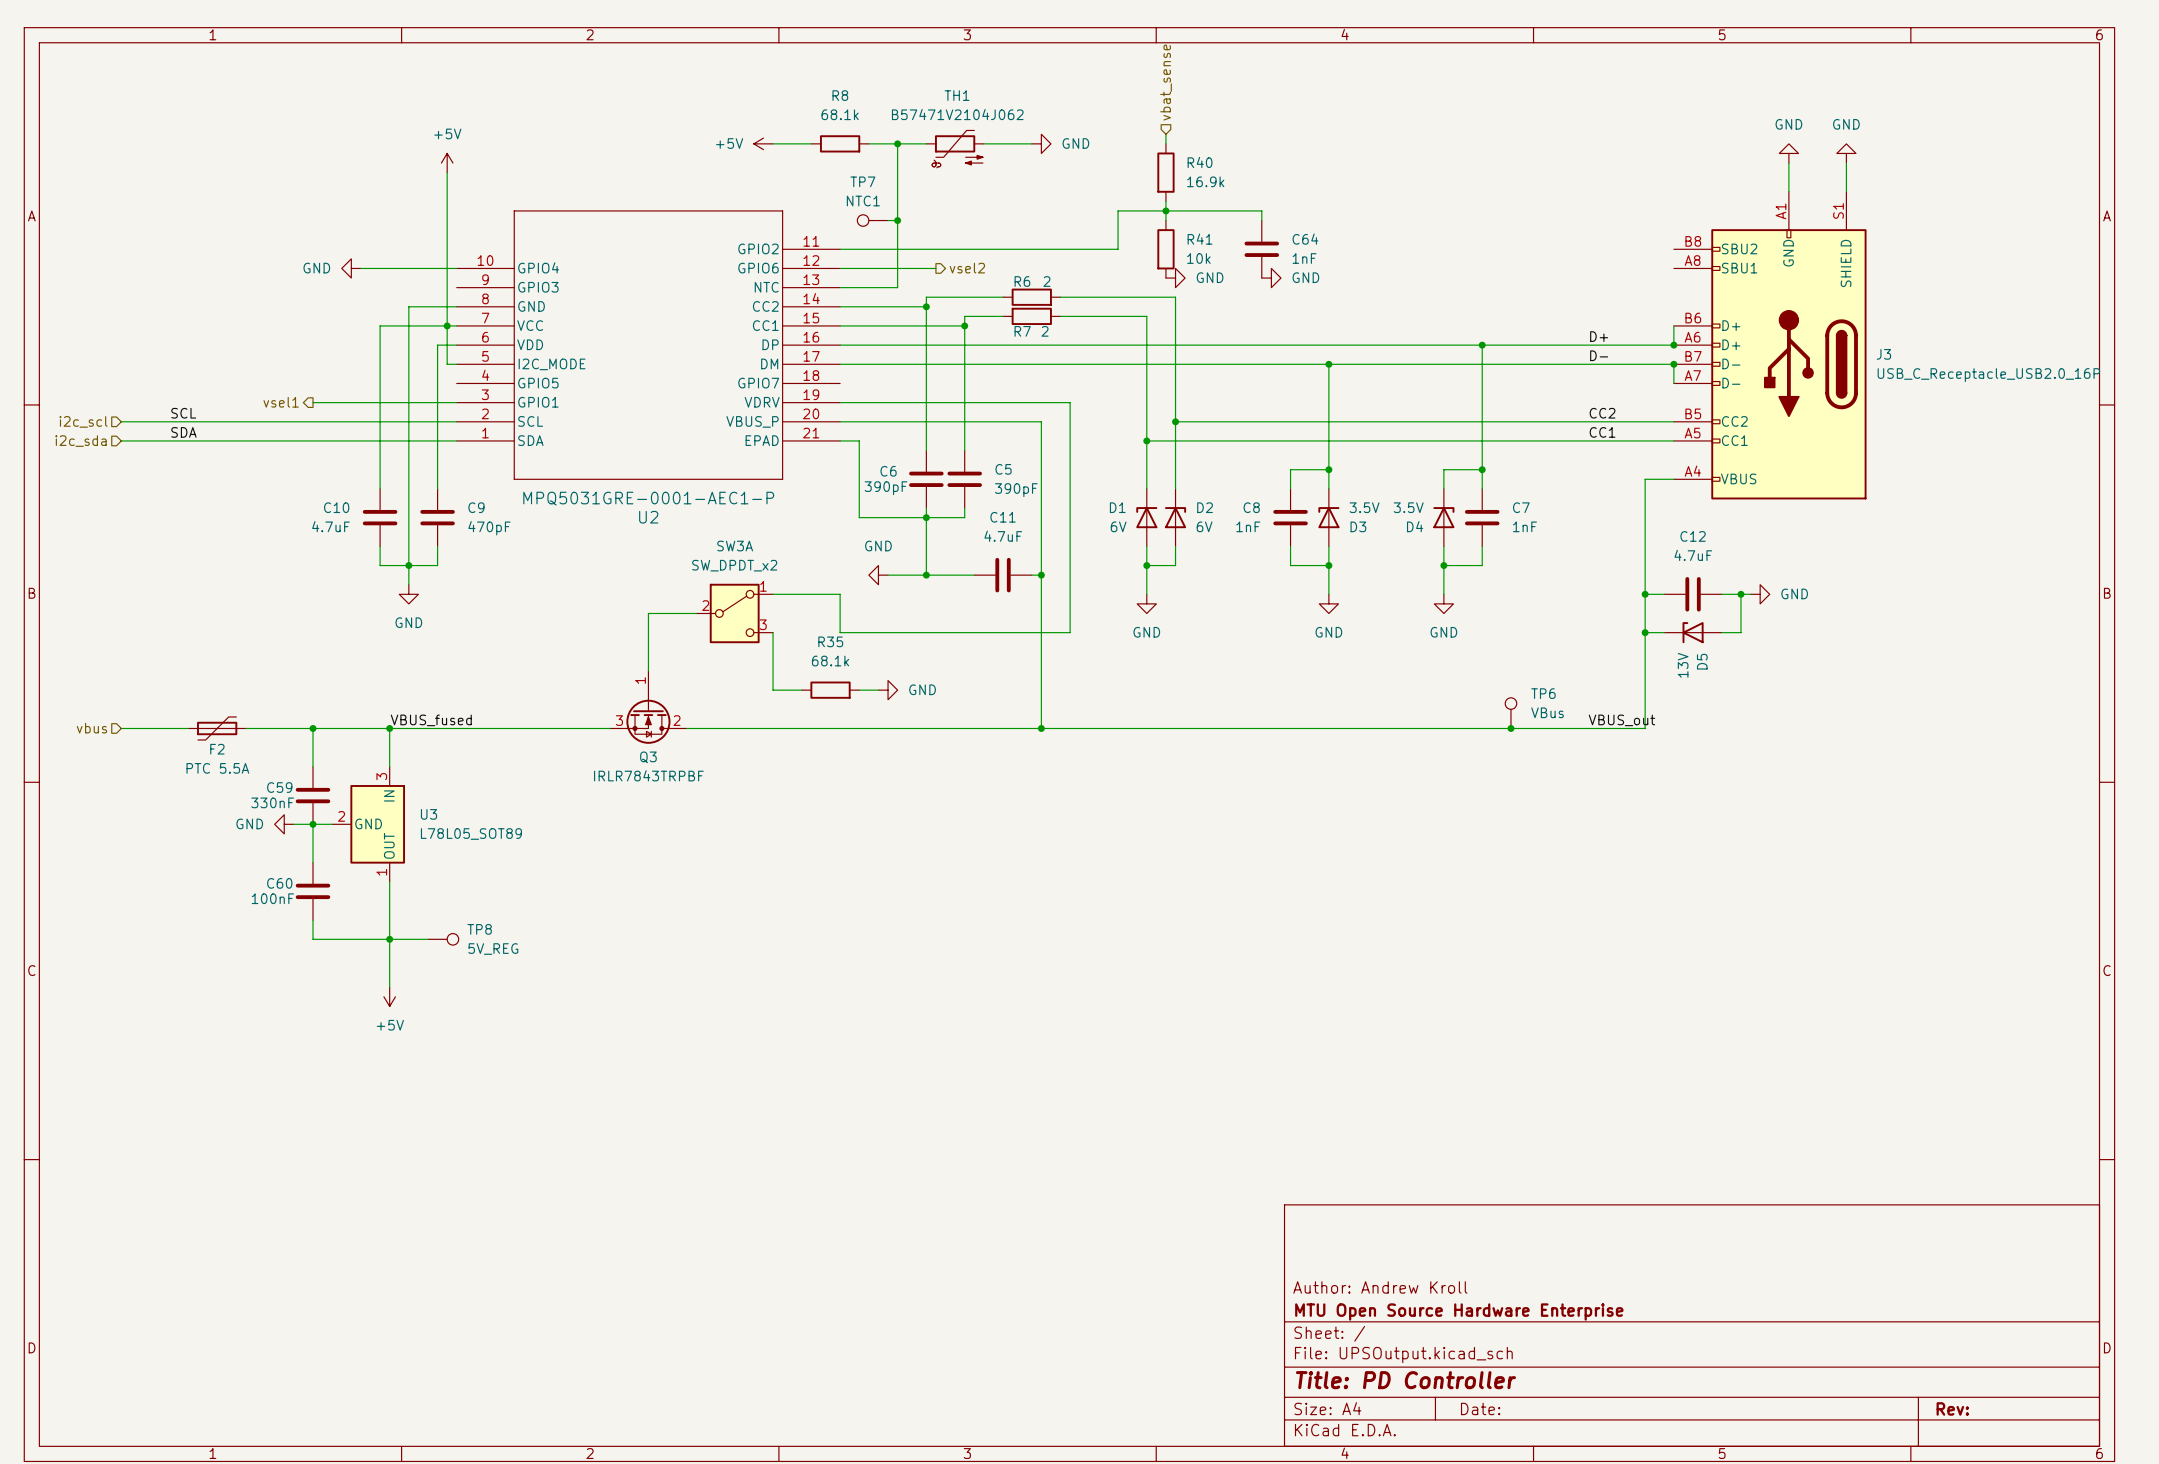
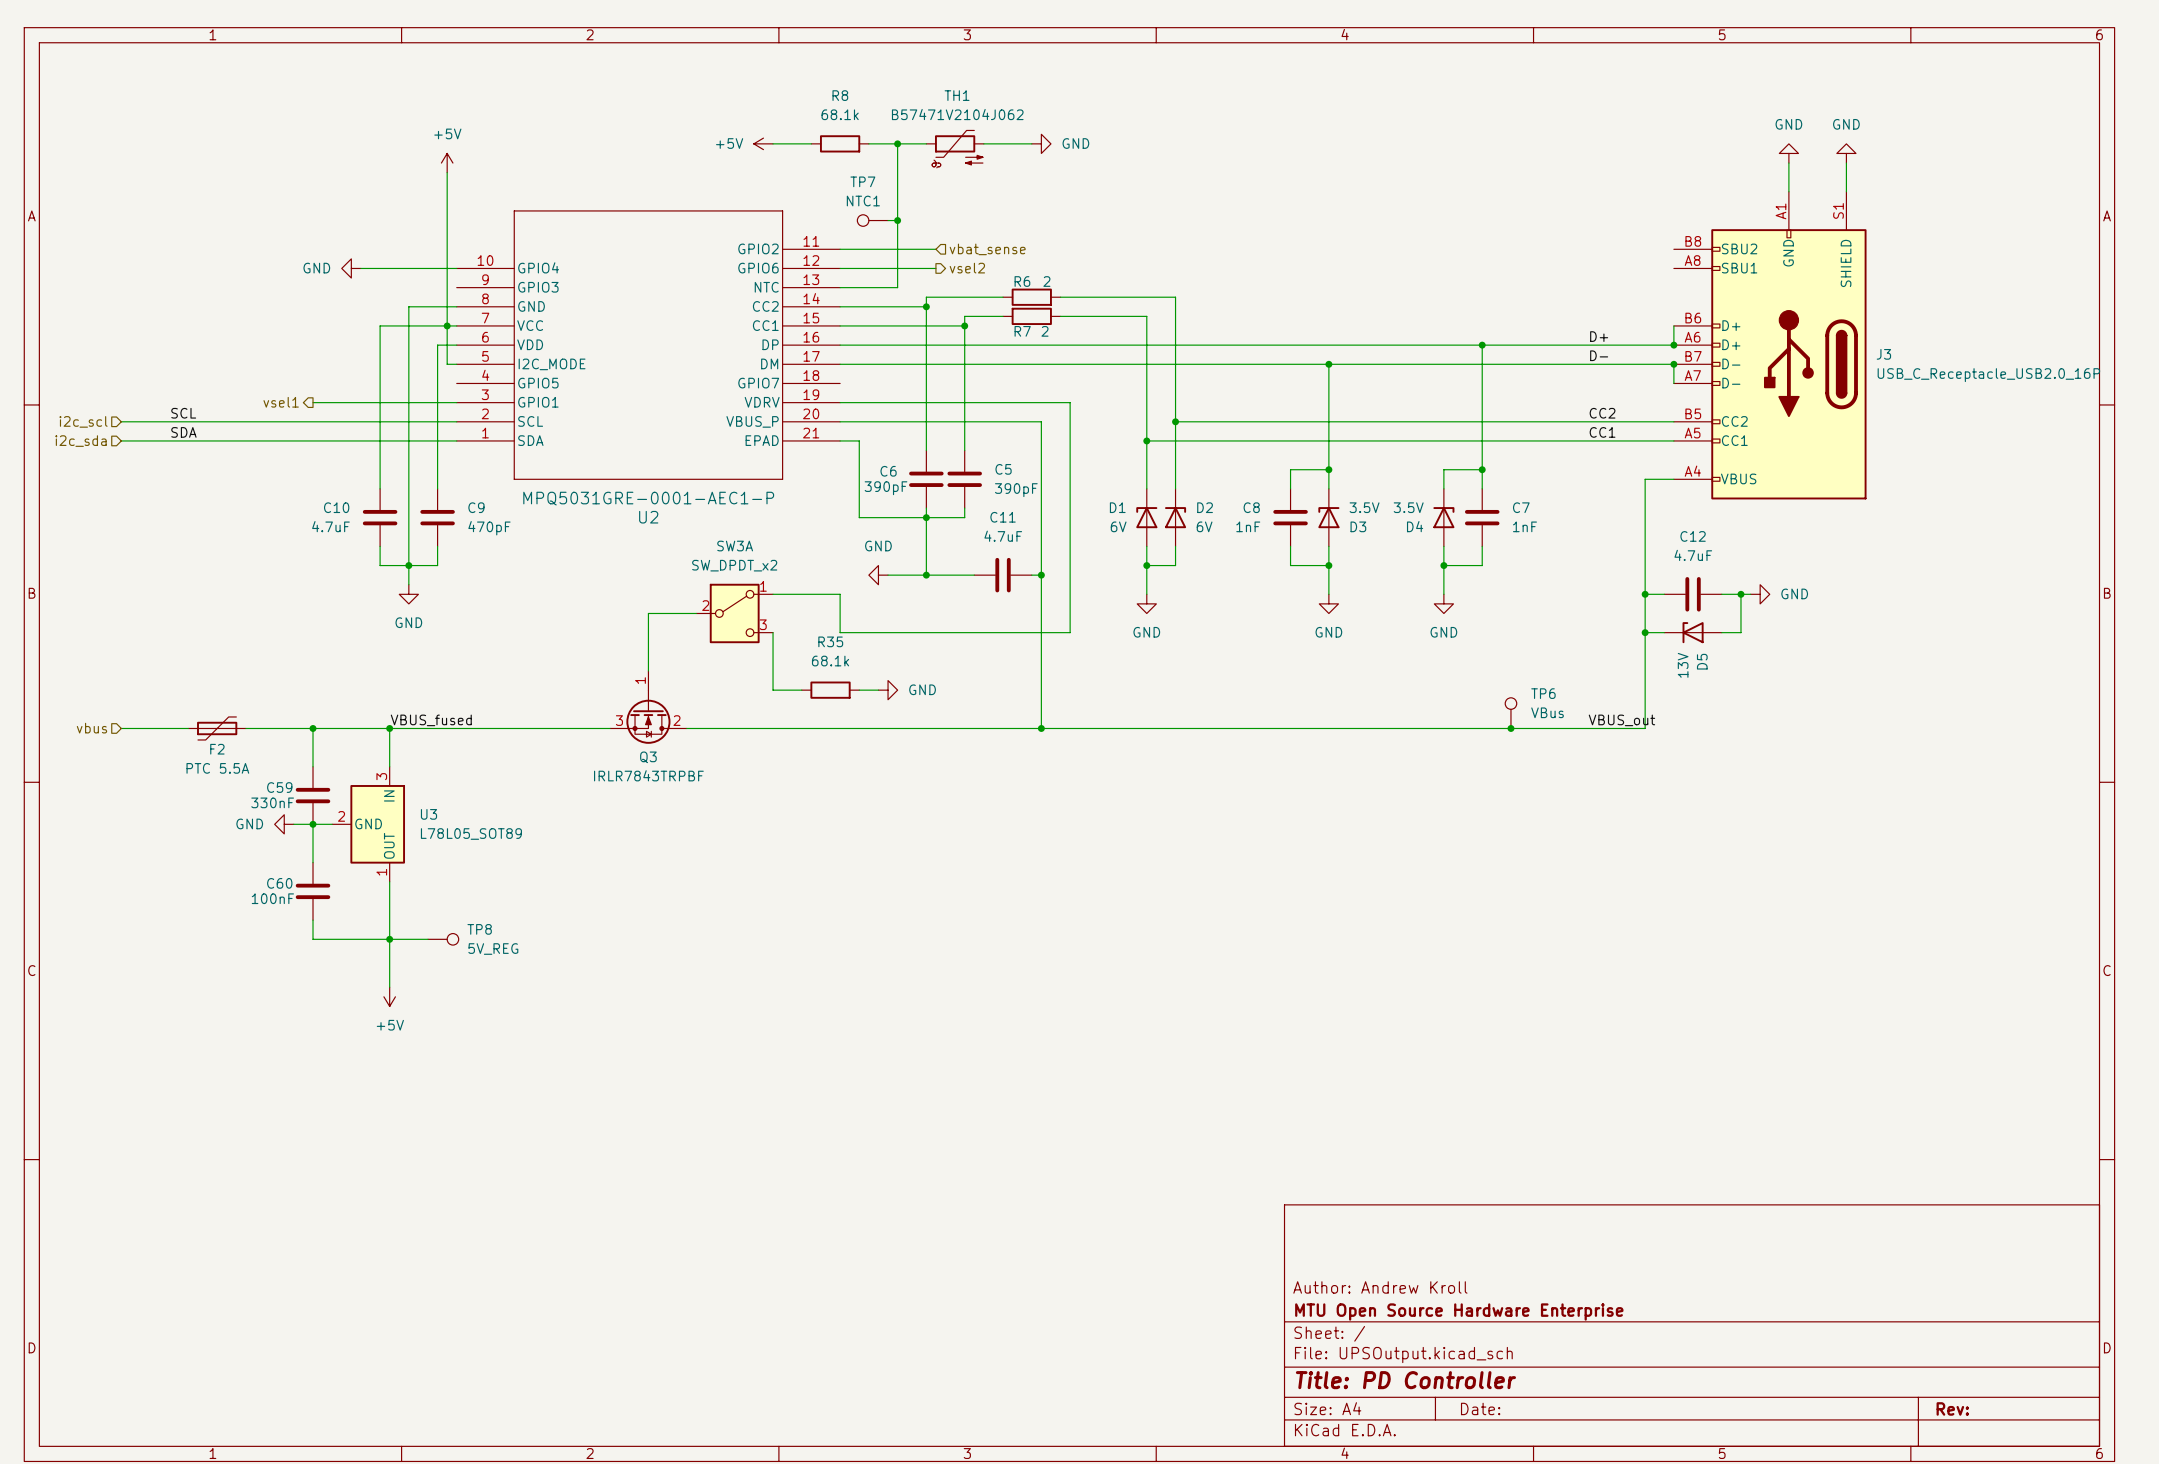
hierarchical label: vbat_sense (1166, 82) -> none
wire: (1165, 134) (1165, 143) -> none
R40: 16.9k (1165, 172) -> none
wire: (1165, 201) (1165, 220) -> none
junction: (1165, 210) -> none
wire: (1261, 220) (1261, 210) (1118, 210) (1118, 249) (935, 249) -> none
hierarchical label: none -> vbat_sense (987, 249)
R41: 10k (1165, 249) -> none
C64: 1nF (1261, 249) -> none
power symbol: GND (1175, 278) -> none
power symbol: GND (1271, 278) -> none

